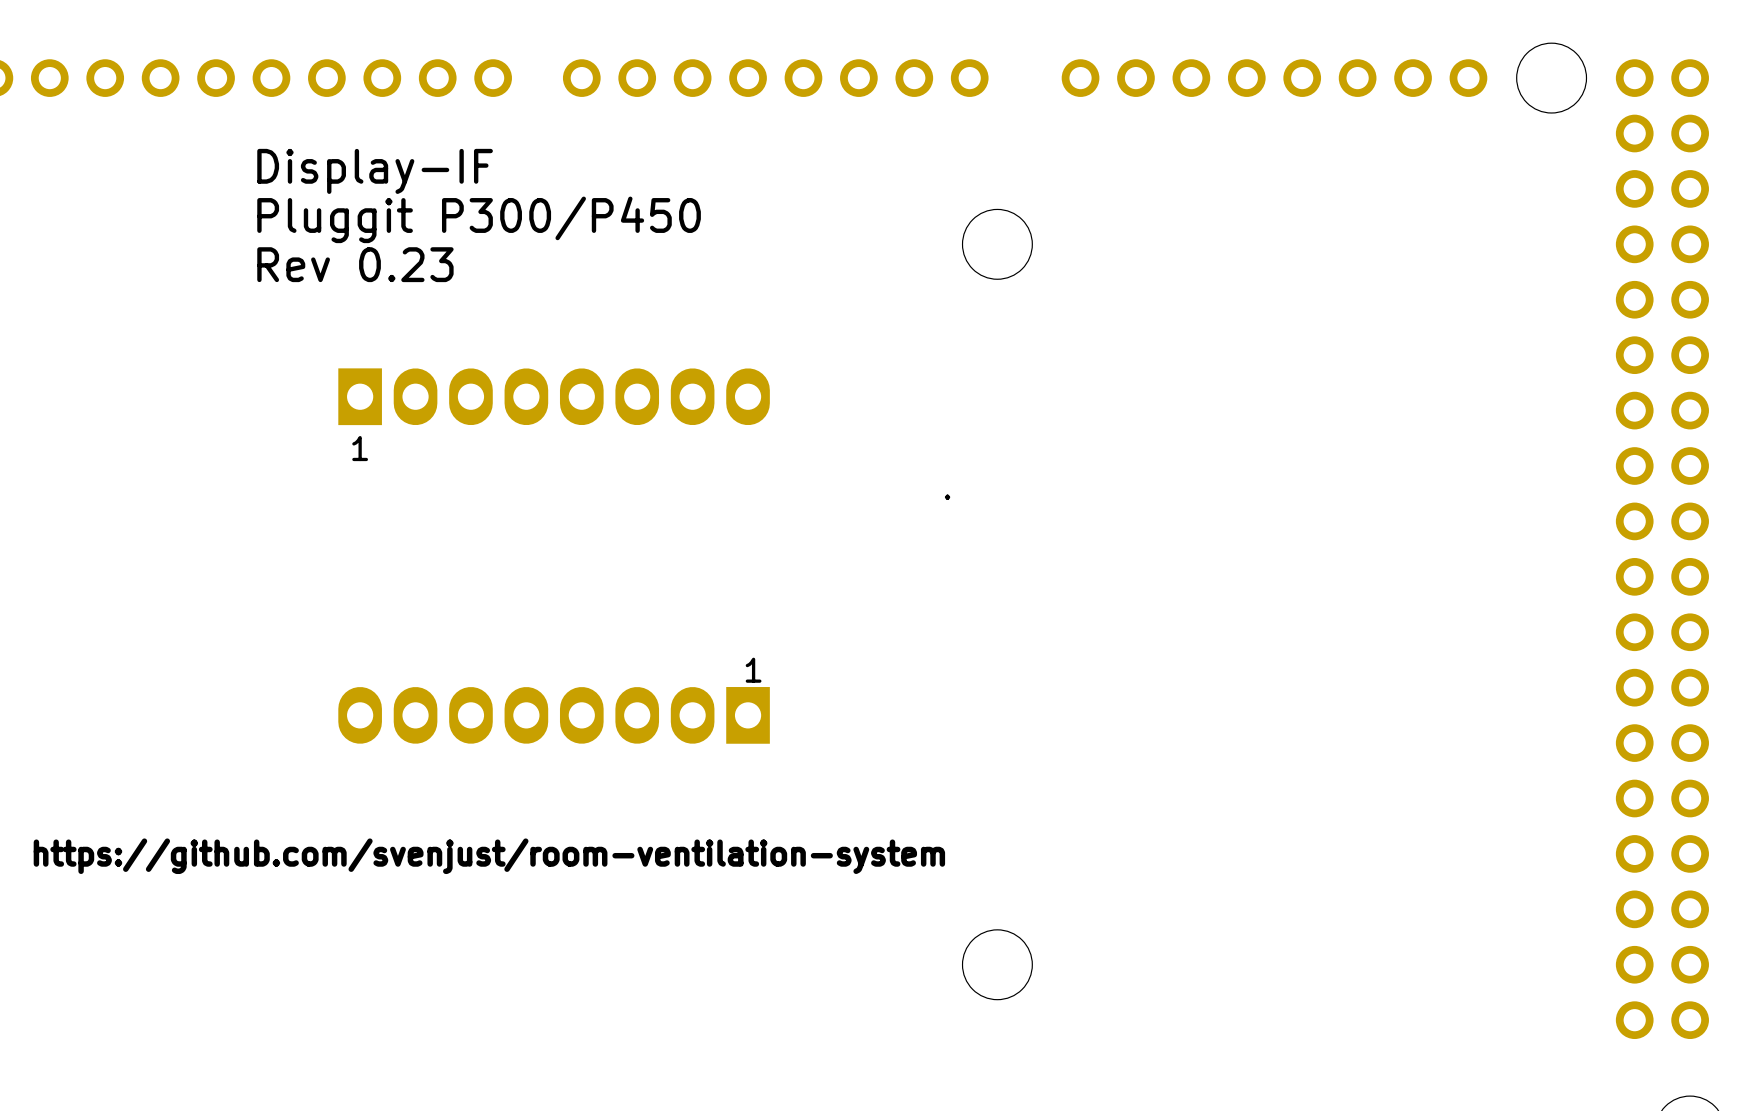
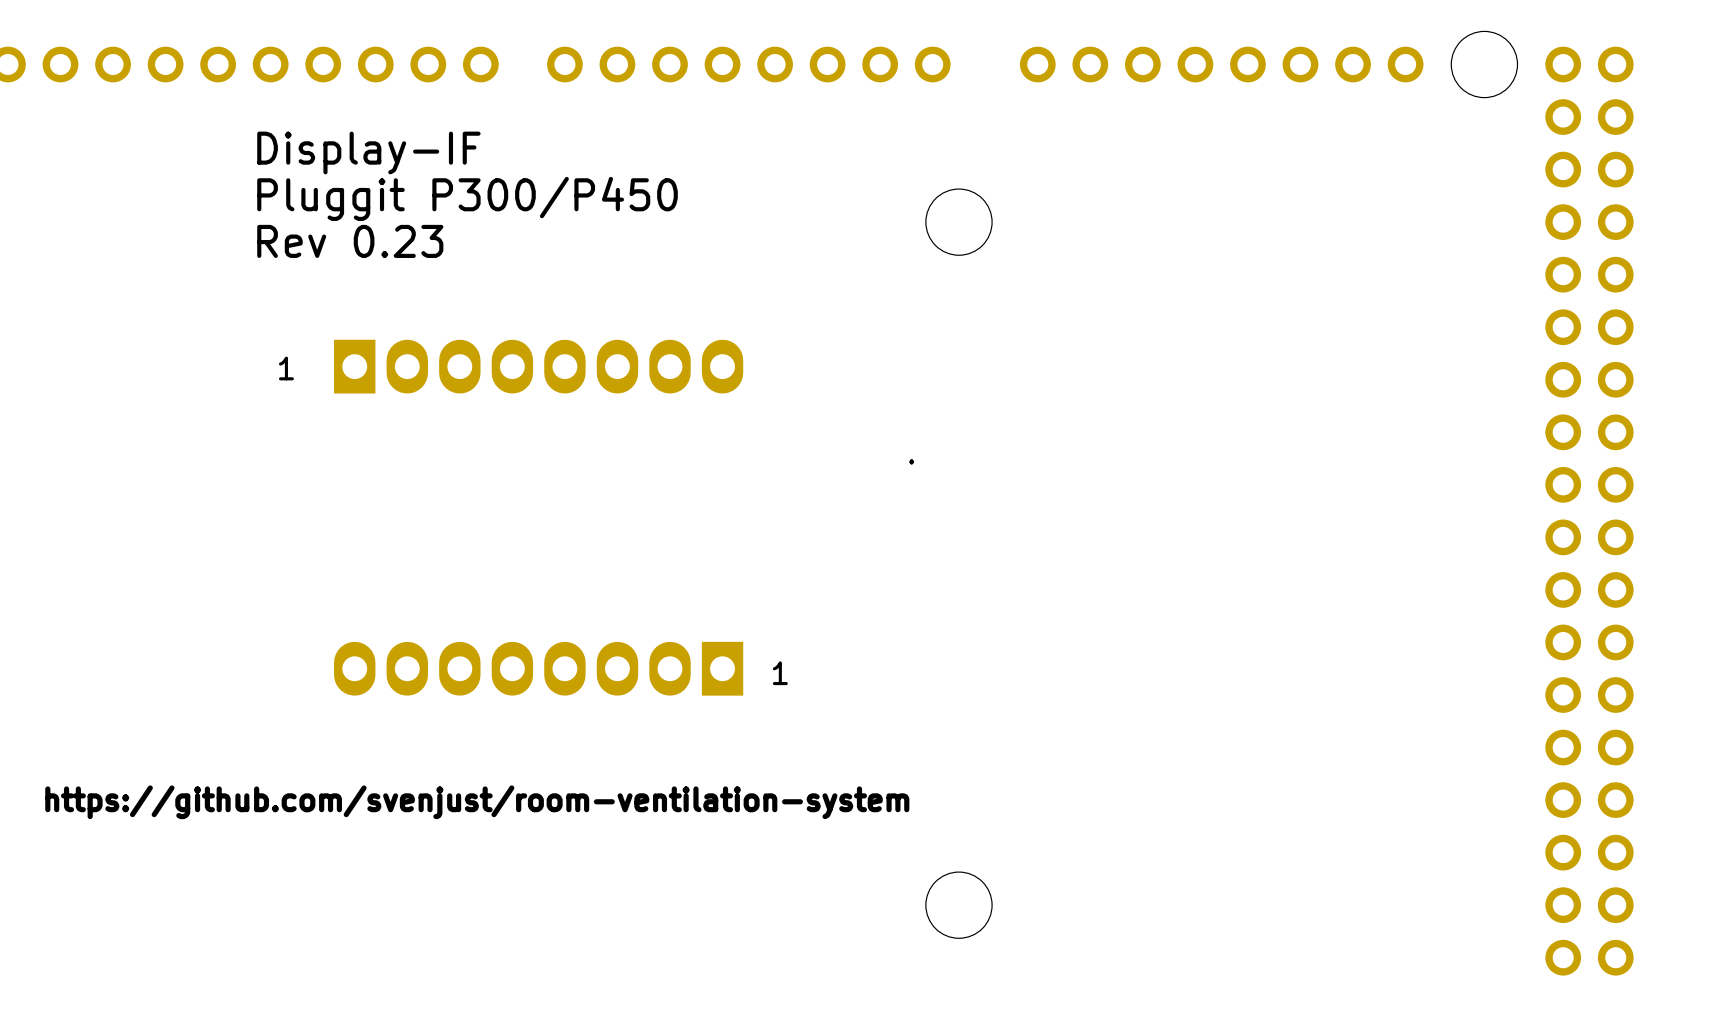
text position: 1 (360, 448) -> 1 (286, 368)
text position: 1 (753, 670) -> 1 (780, 673)

